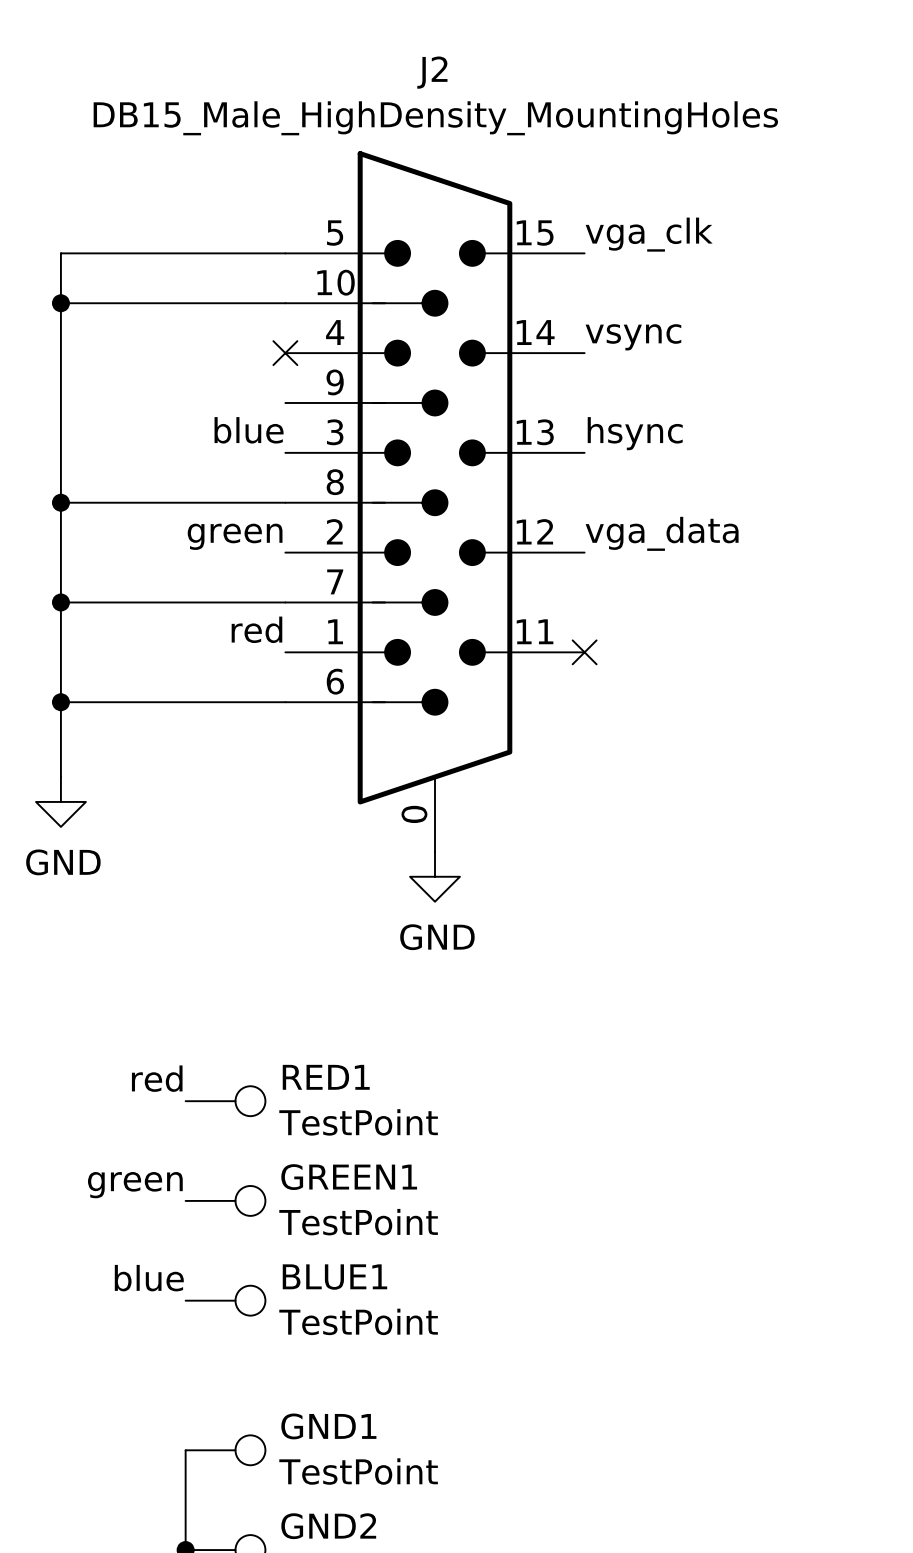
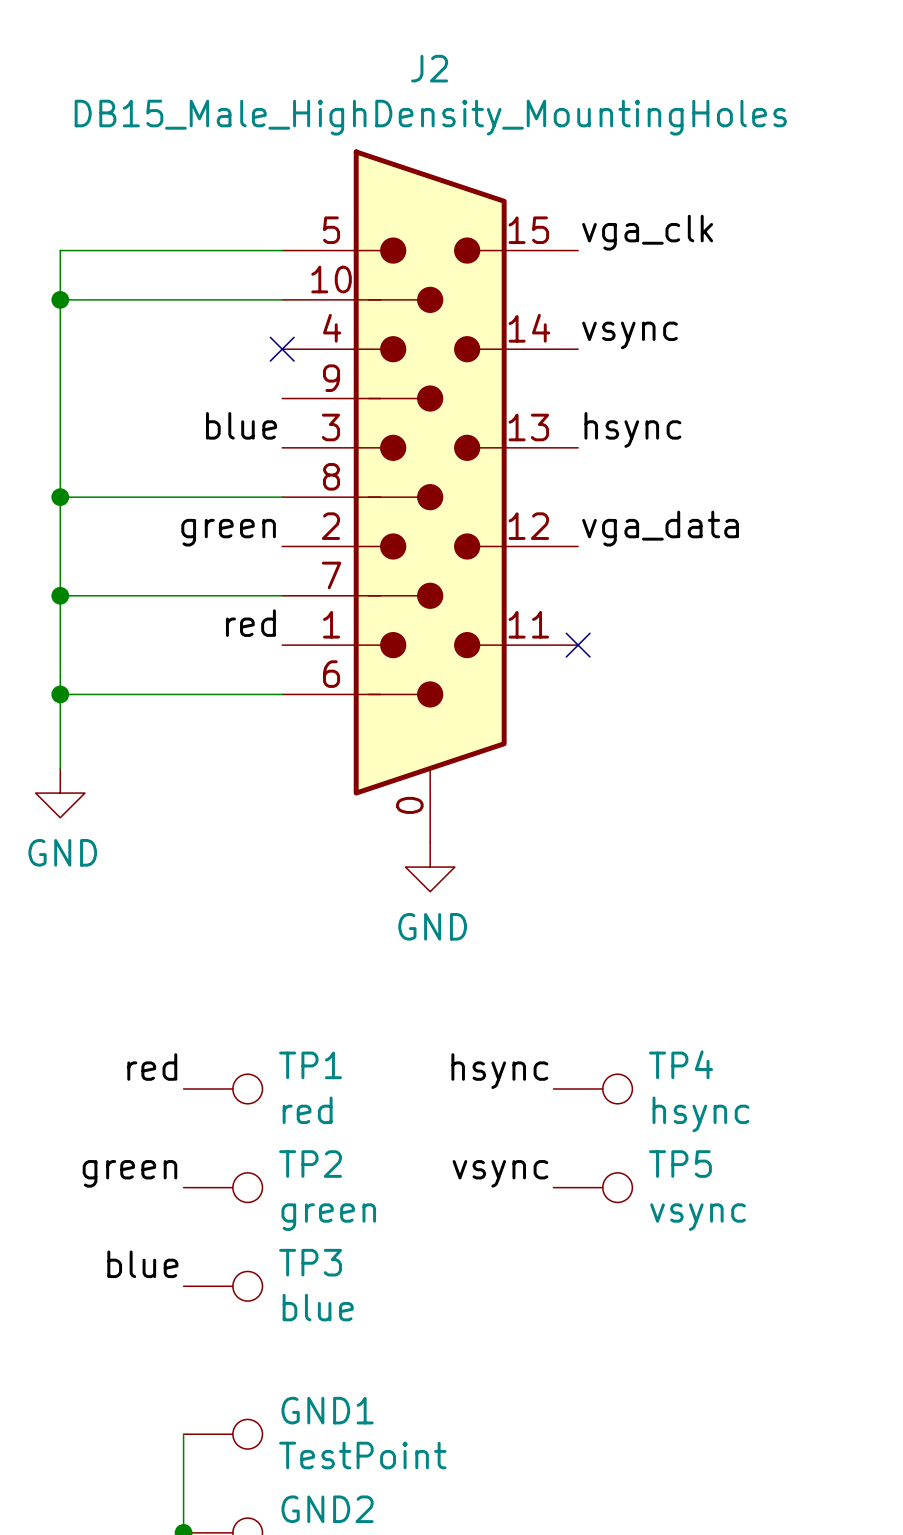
RED1 name: RED1 (326, 1077) -> TP1 (310, 1065)
label: none -> hsync (499, 1071)
TP4: none -> hsync (592, 1088)
RED1 value: TestPoint (358, 1122) -> red (307, 1110)
GREEN1 name: GREEN1 (349, 1177) -> TP2 (310, 1164)
label: none -> vsync (500, 1173)
TP5: none -> vsync (592, 1187)
GREEN1 value: TestPoint (358, 1222) -> green (328, 1217)
BLUE1 name: BLUE1 (334, 1277) -> TP3 (310, 1262)
BLUE1 value: TestPoint (358, 1321) -> blue (318, 1307)

